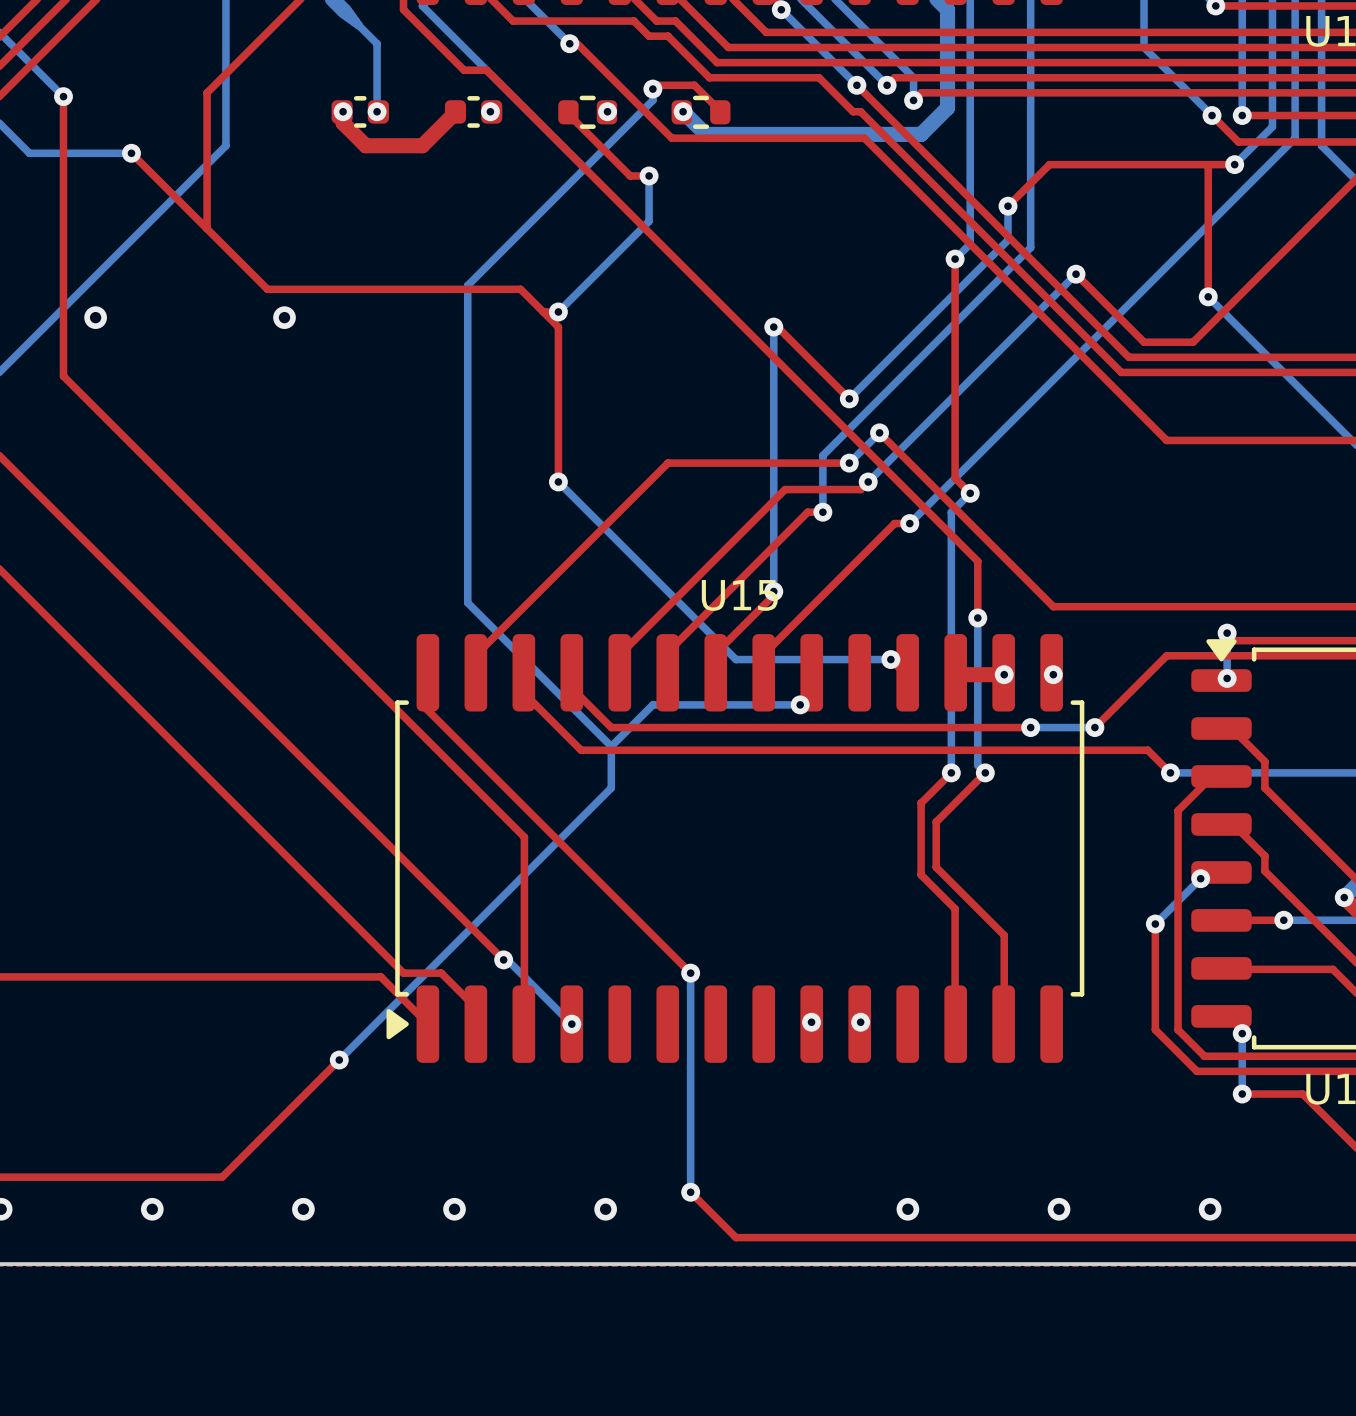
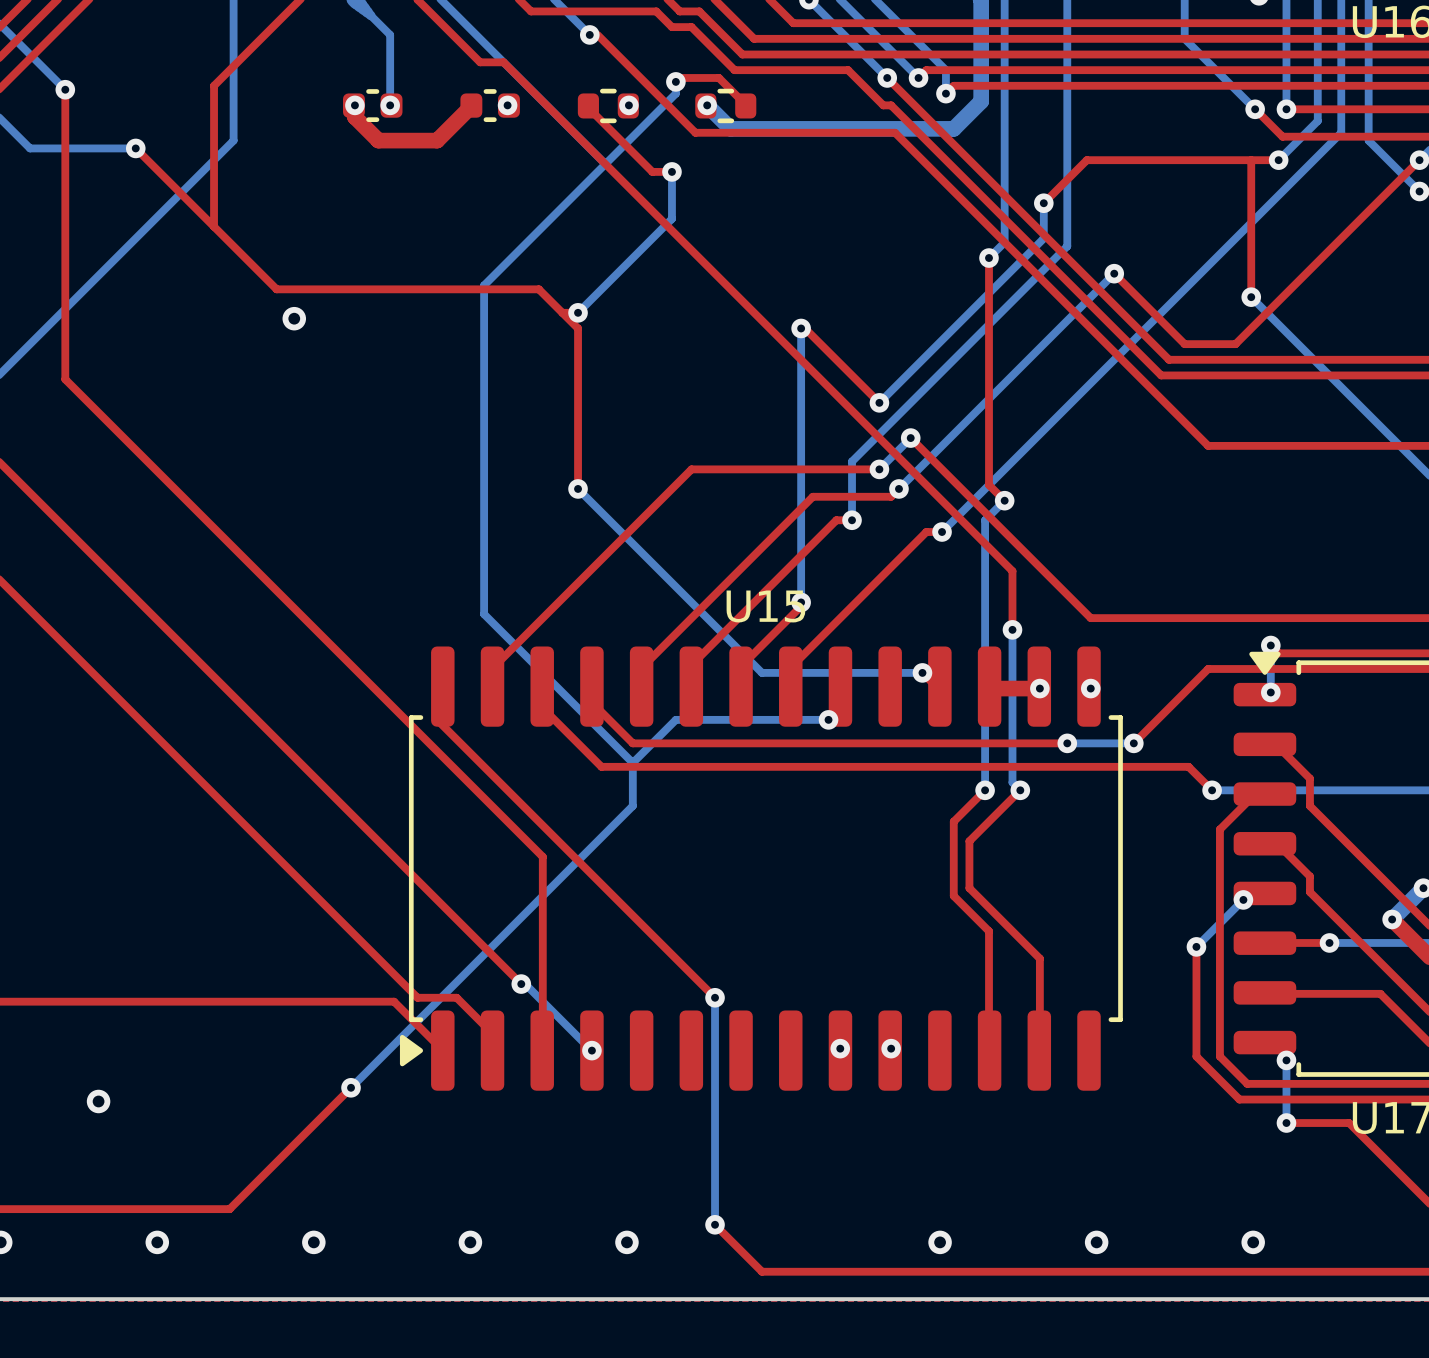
via: (95, 317) -> none
via: none -> (98, 1101)

